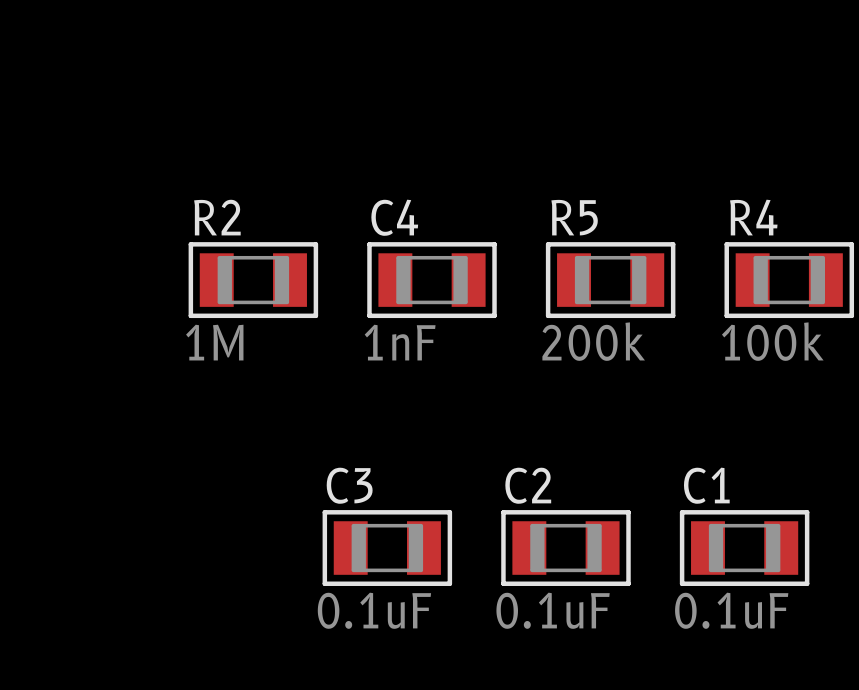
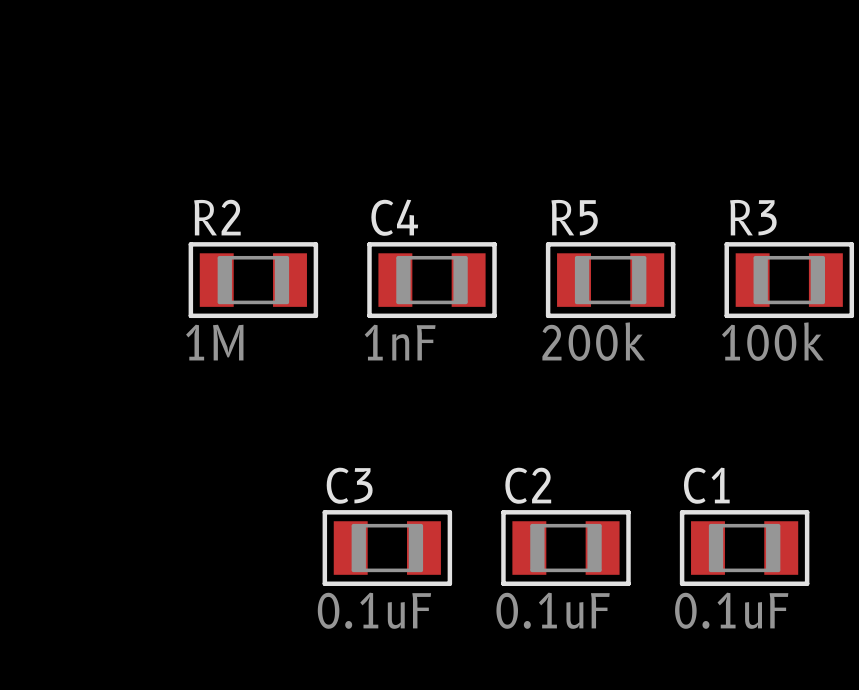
R4 name: R4 (753, 217) -> R3 (753, 217)

